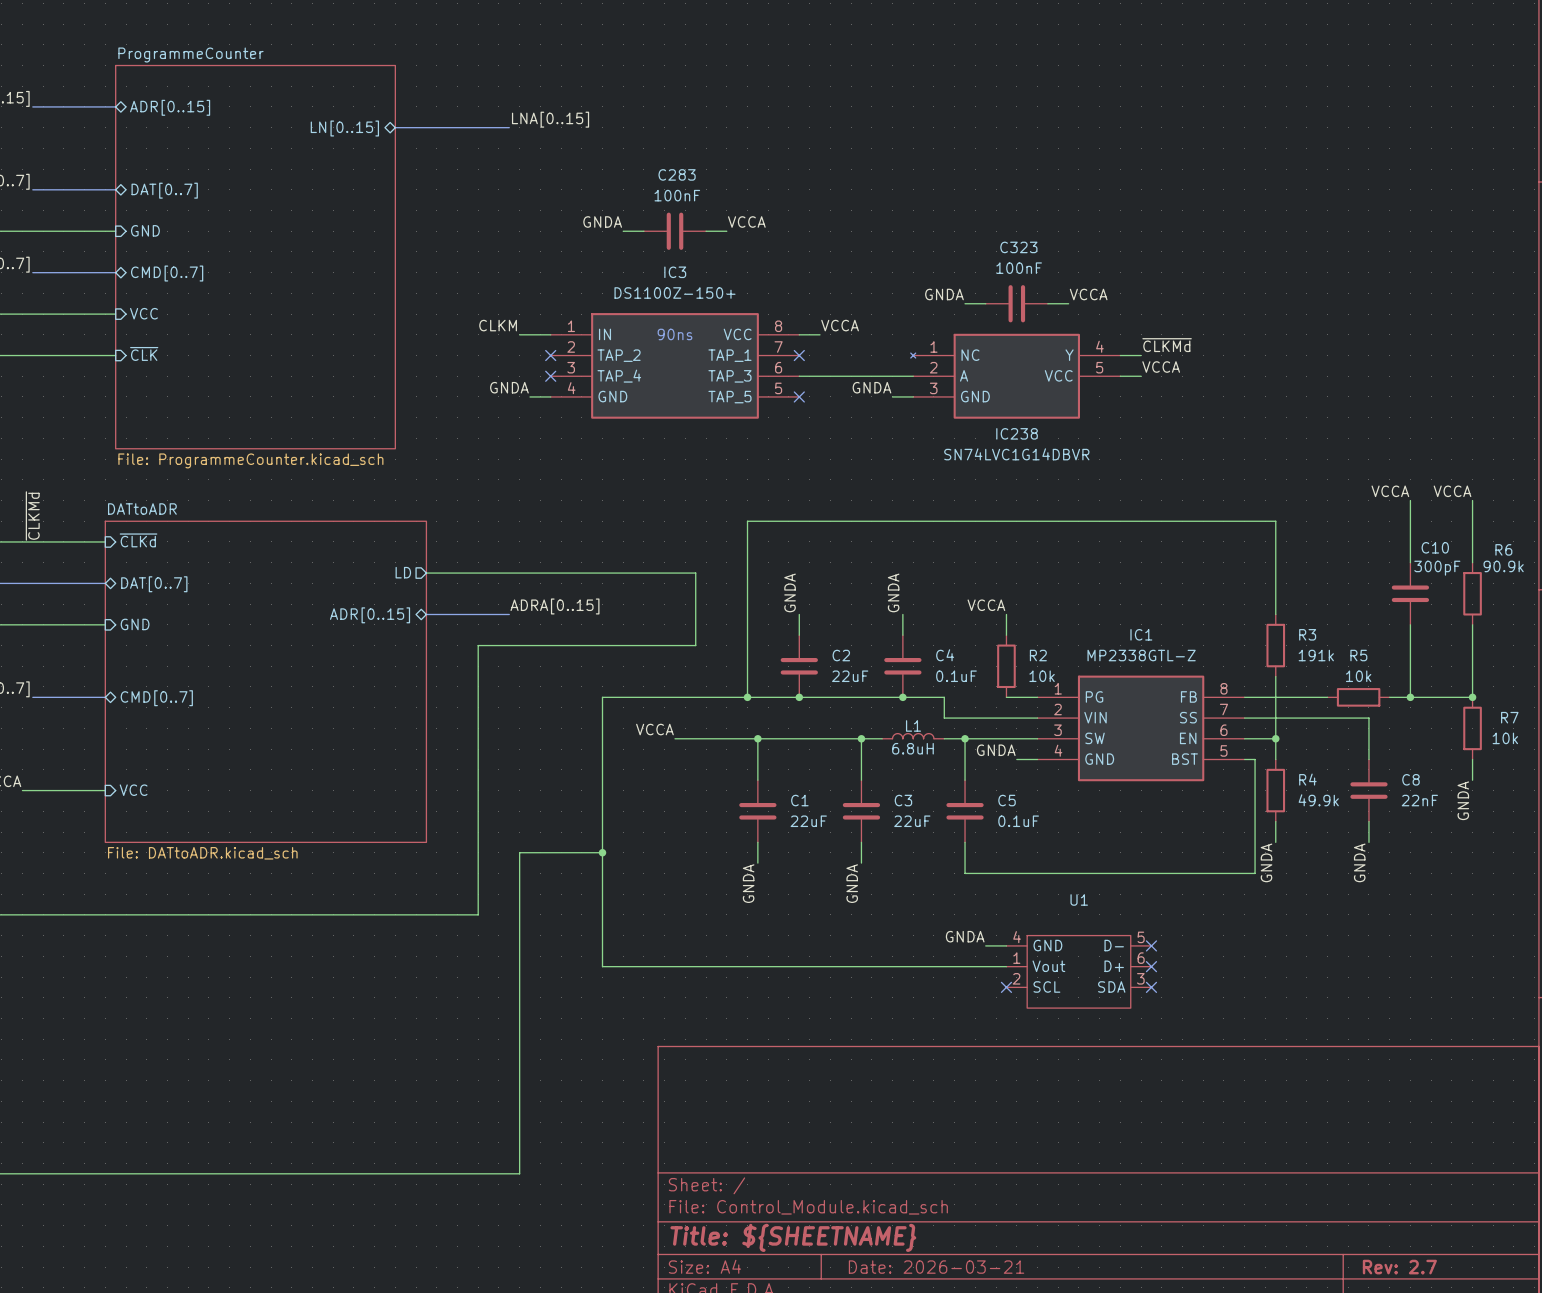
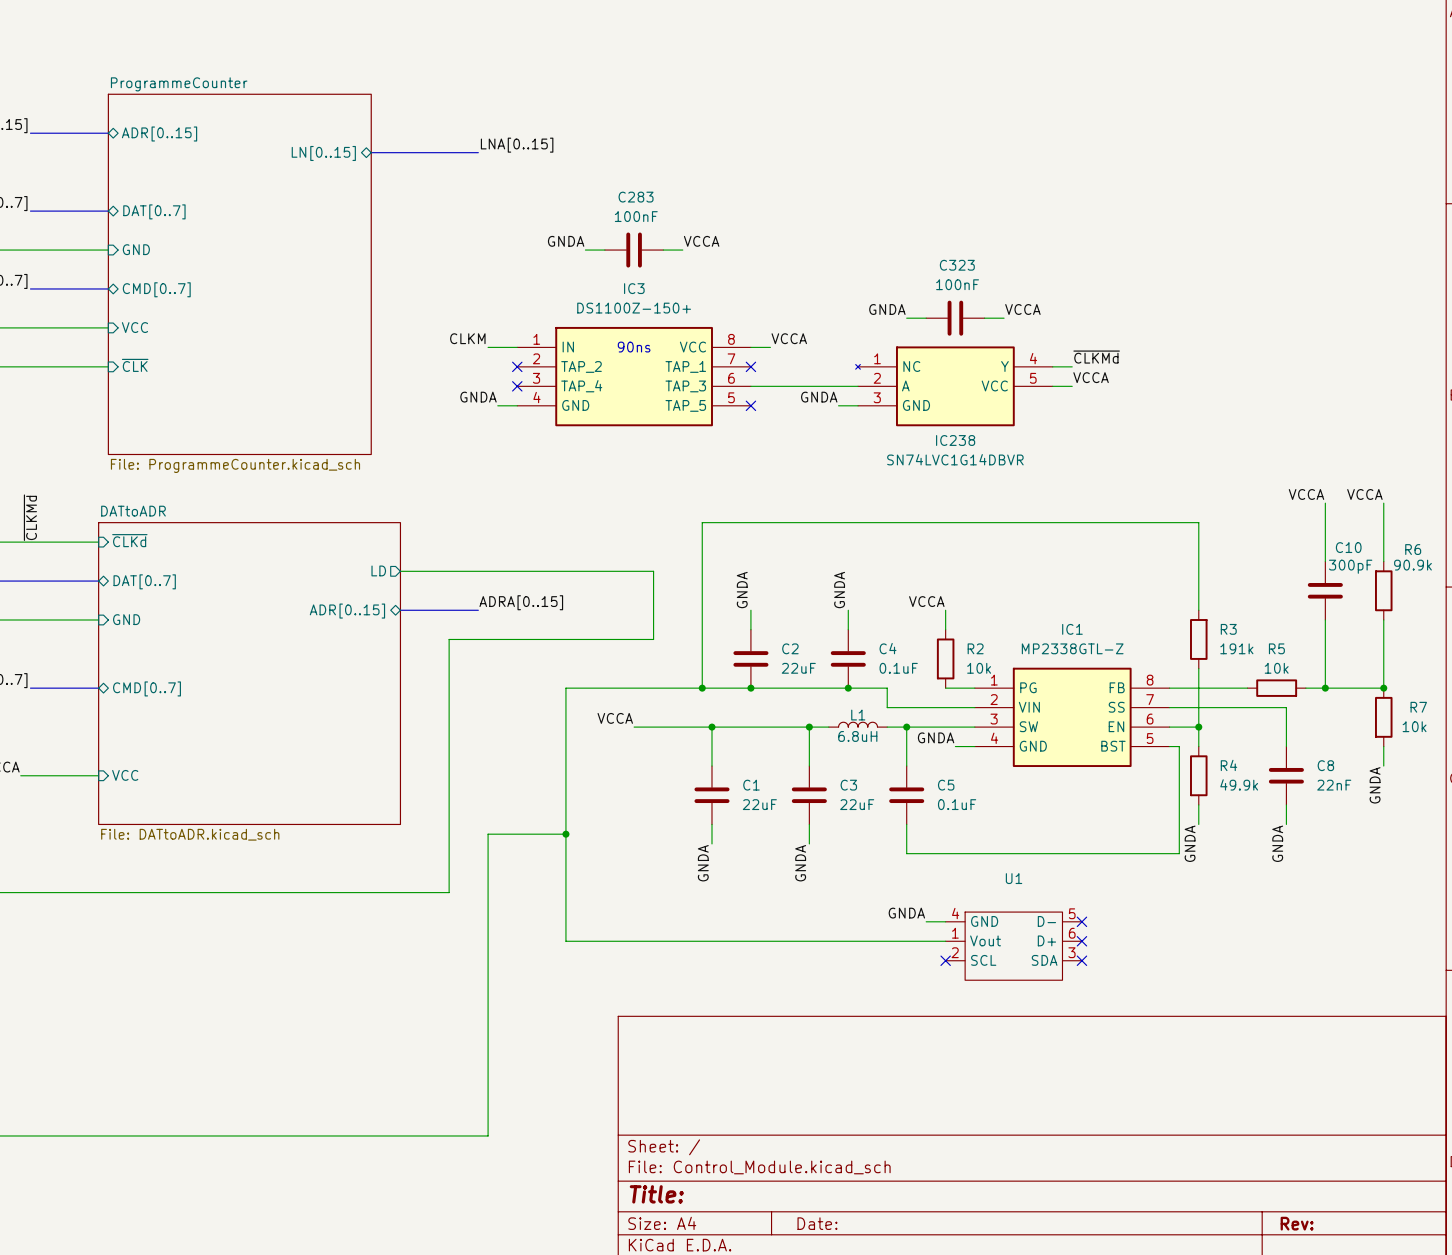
title block: Title: ${SHEETNAME} (793, 1237) -> Title: (656, 1194)
title block: Date: 2026-03-21 (936, 1267) -> Date: (817, 1223)
title block: Rev: 2.7 (1399, 1267) -> Rev: (1297, 1223)

